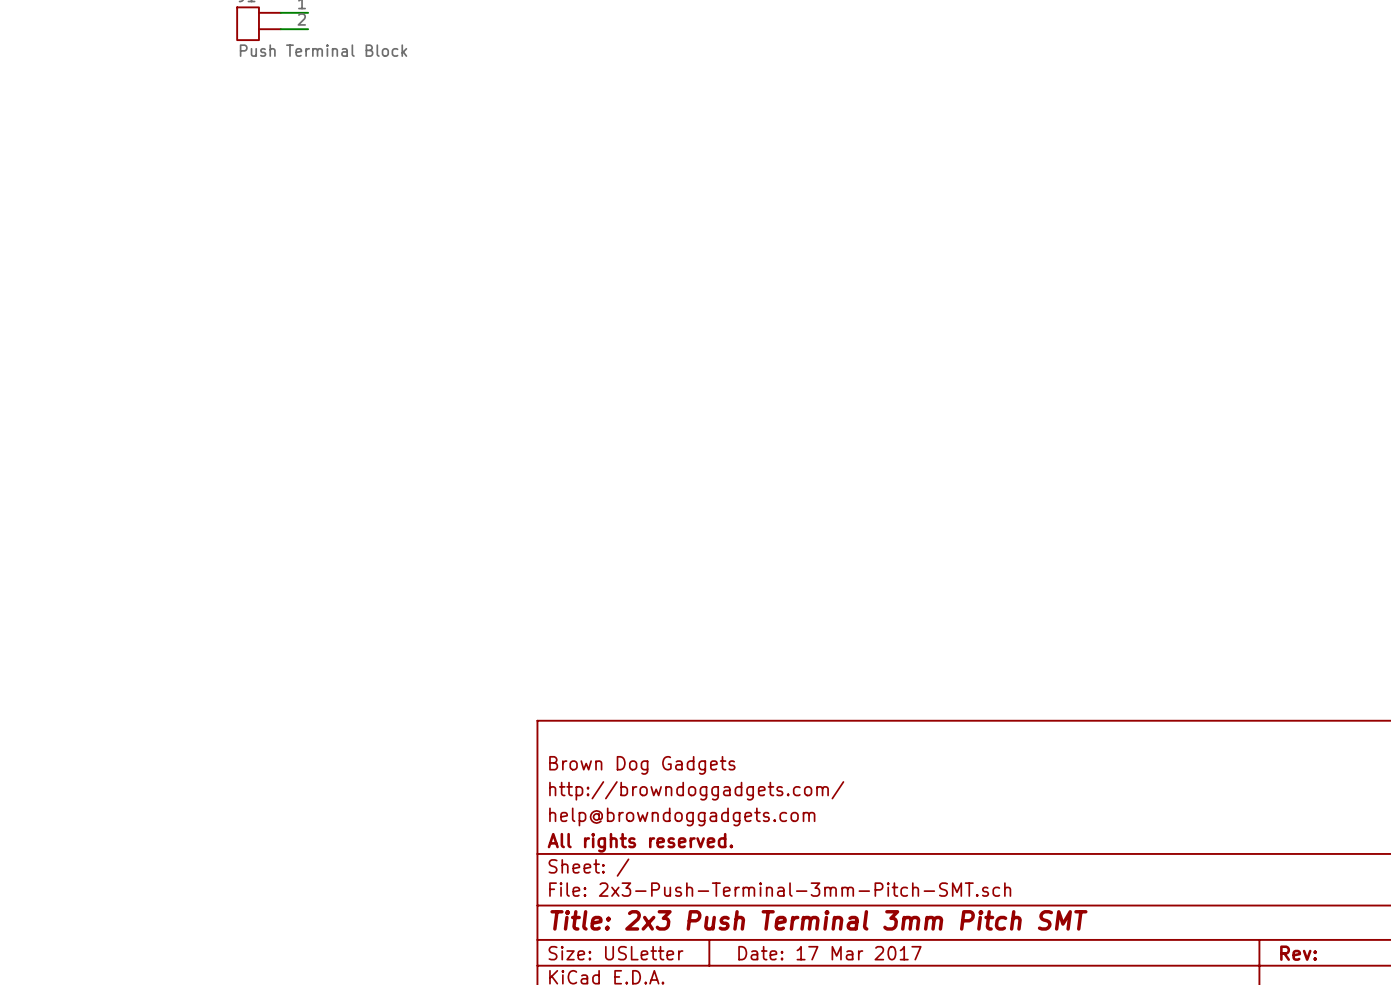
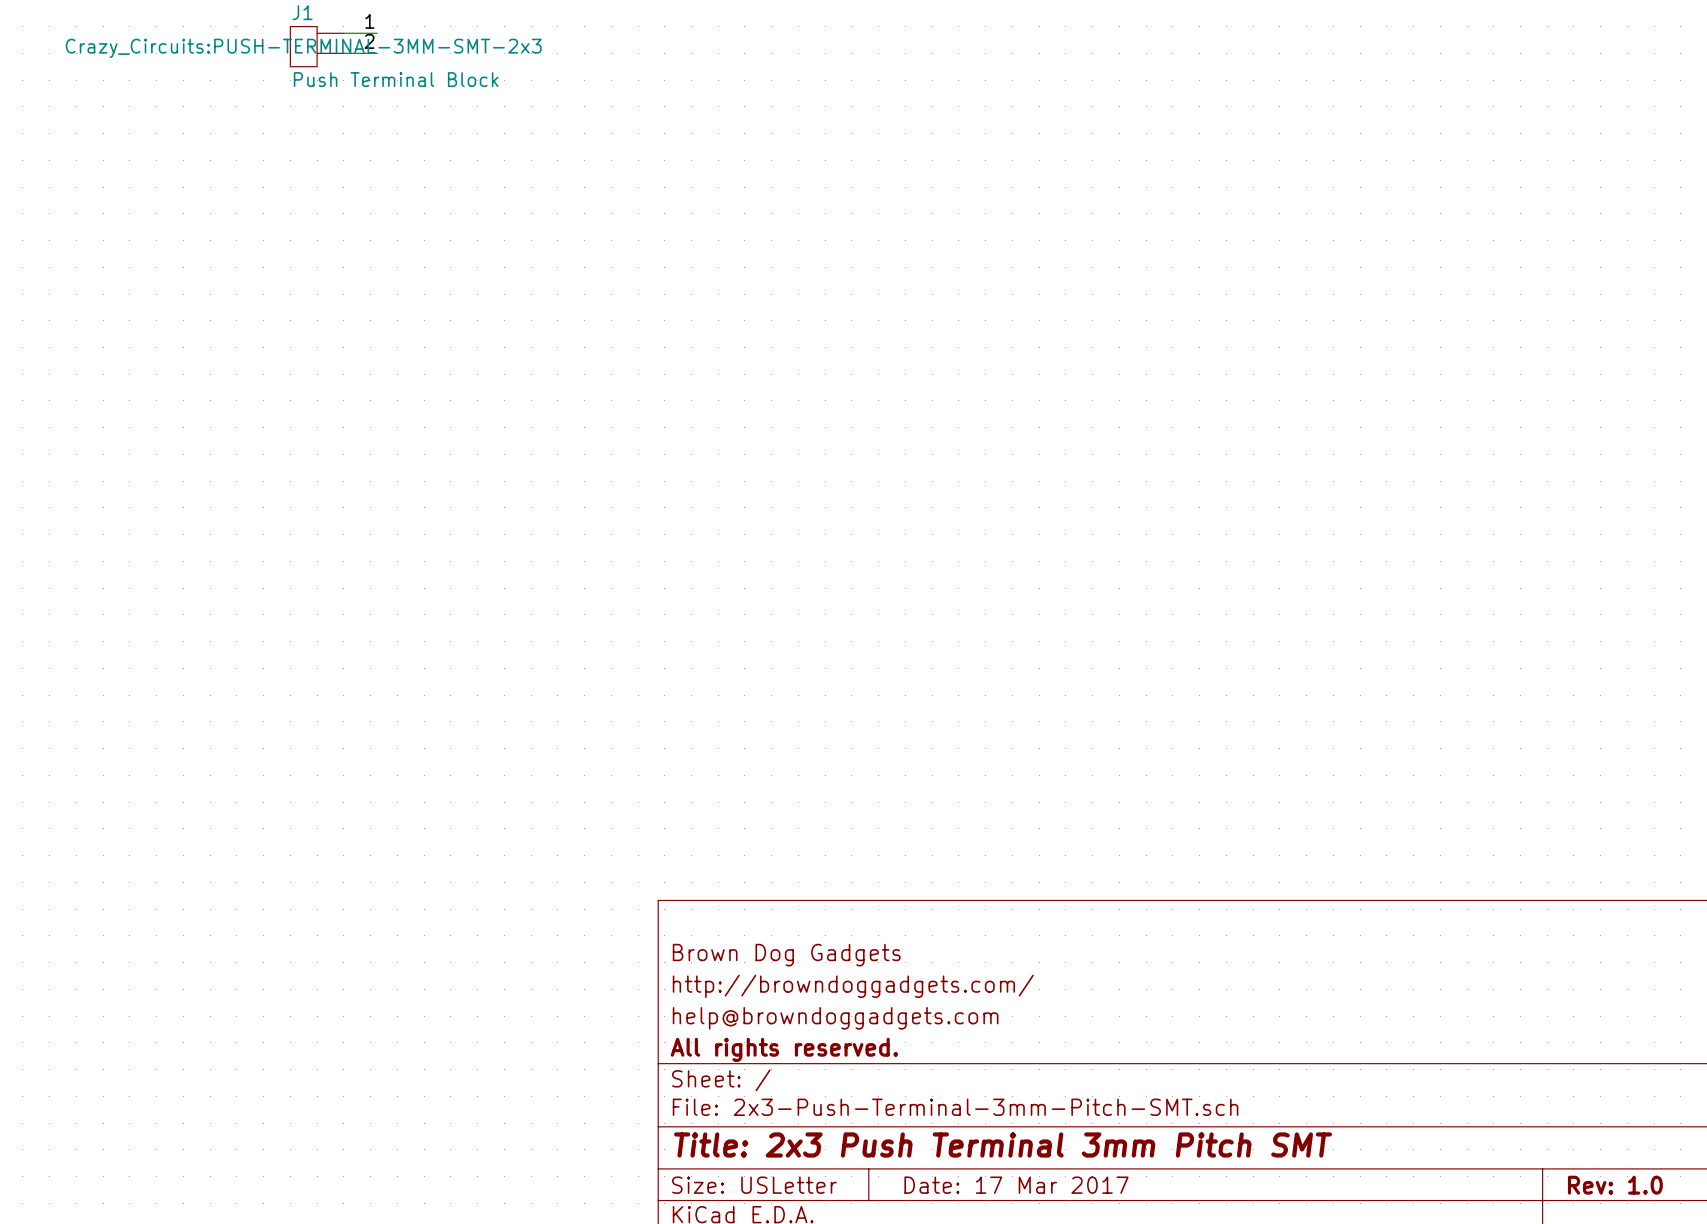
J1 text: none -> Crazy_Circuits:PUSH-TERMINAL-3MM-SMT-2x3 (303, 48)
title block: Rev: (1298, 953) -> Rev: 1.0 (1615, 1185)

